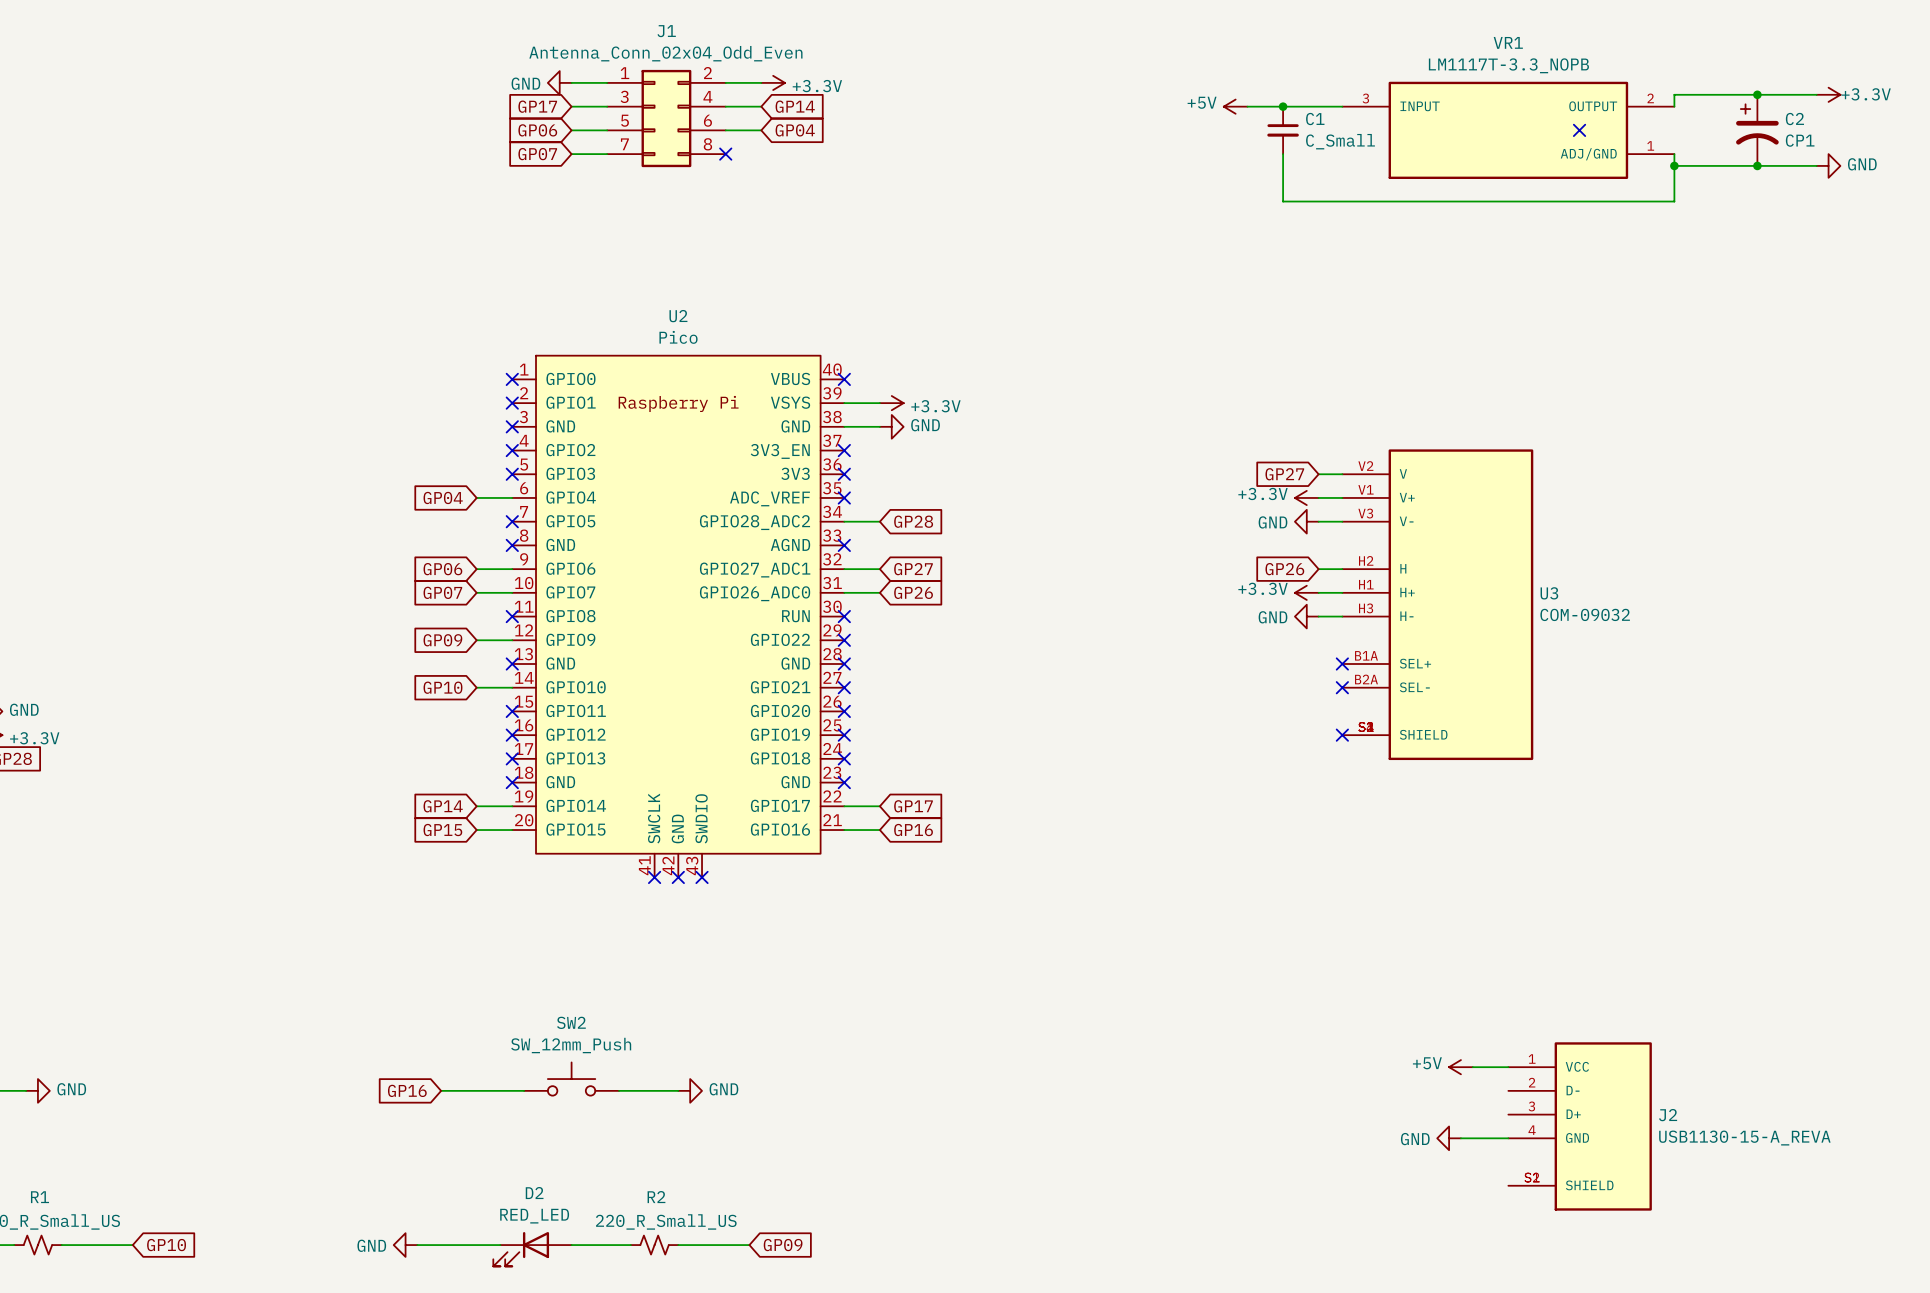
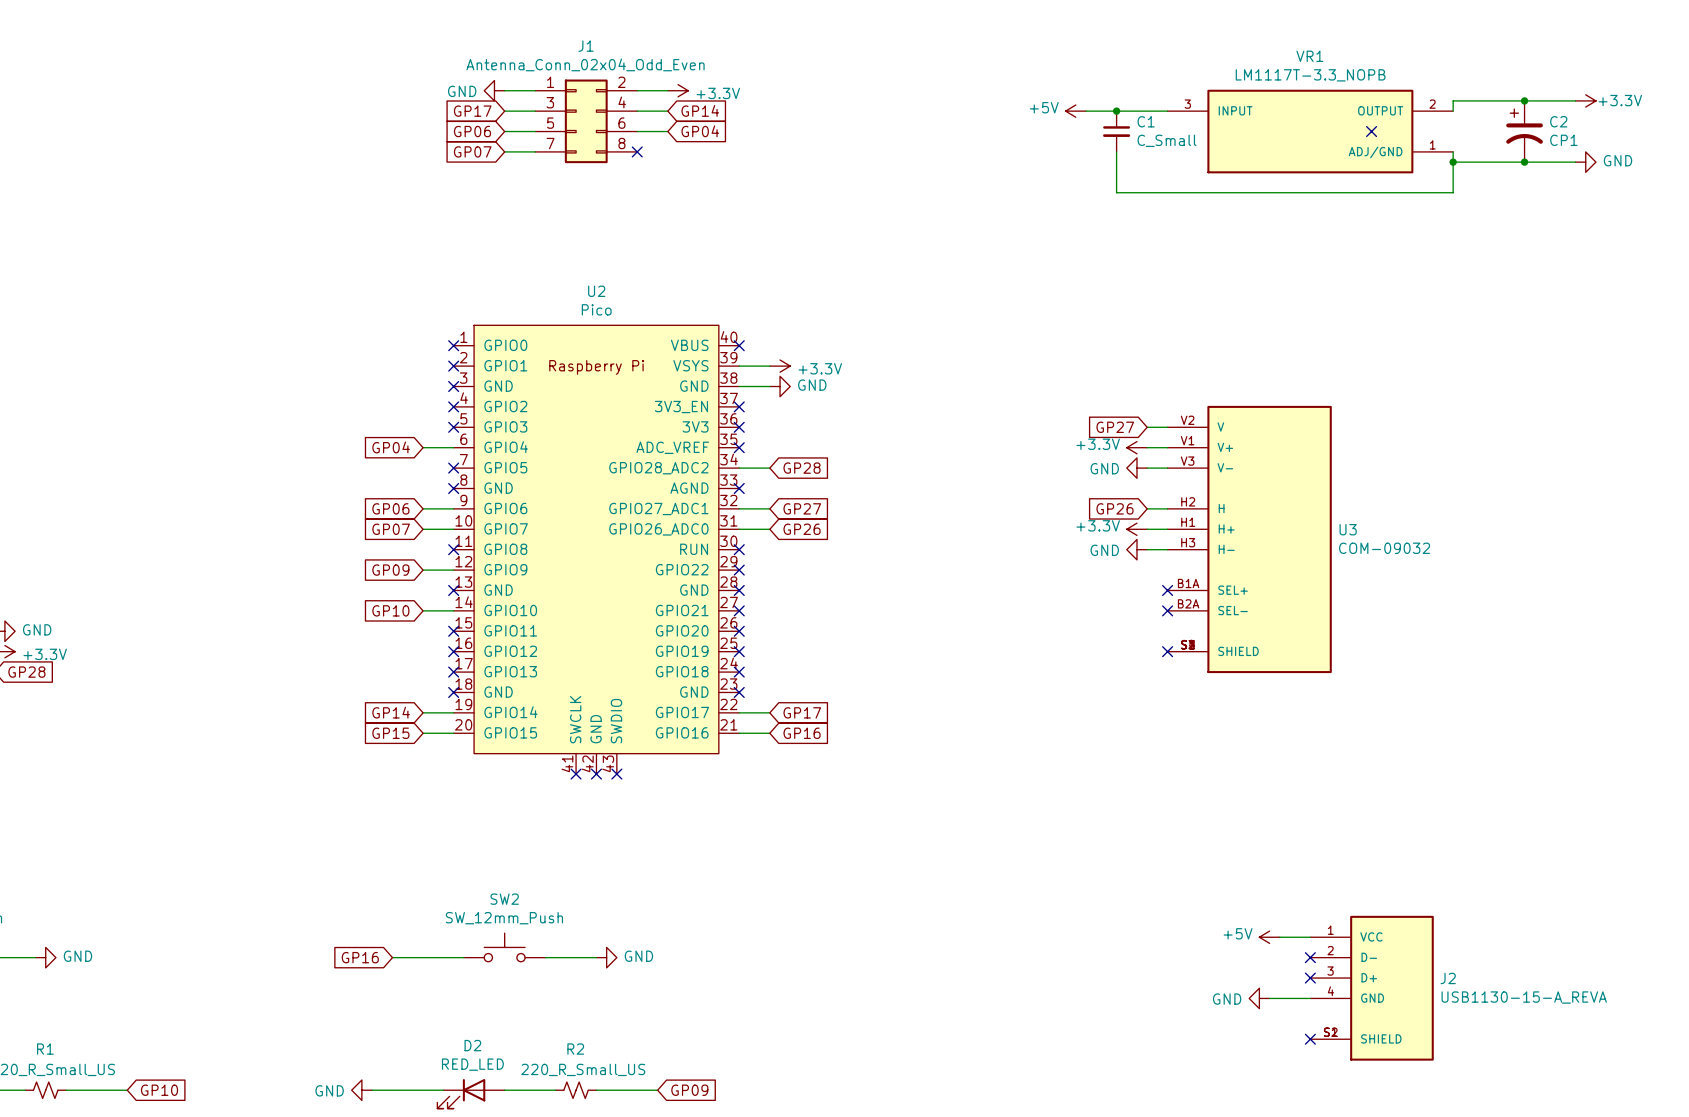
no-connect mark: none -> (1310, 957)
no-connect mark: none -> (1310, 978)
no-connect mark: none -> (1310, 1039)

